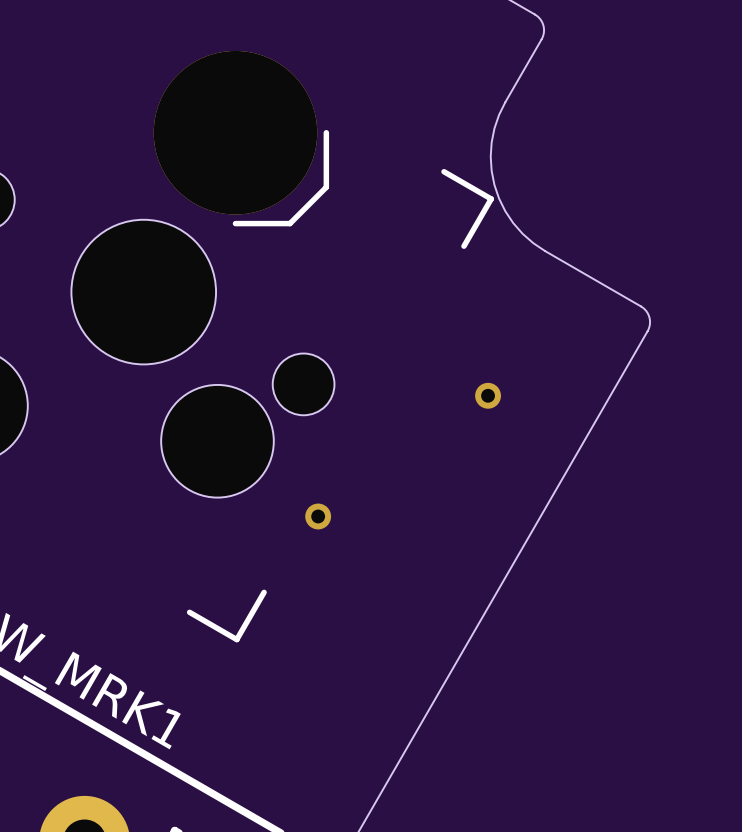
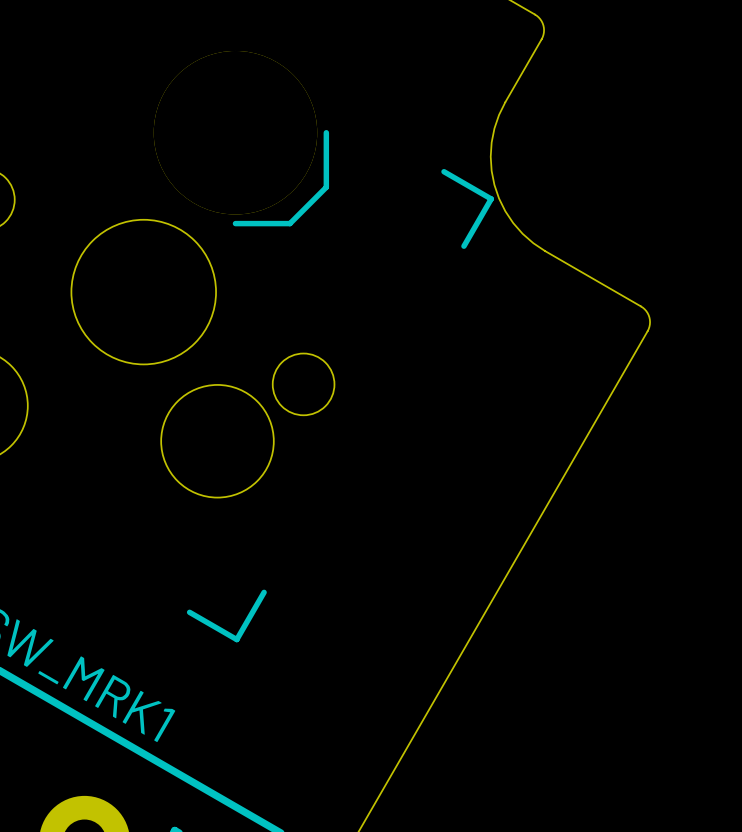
via: (488, 395) -> none
via: (318, 516) -> none

